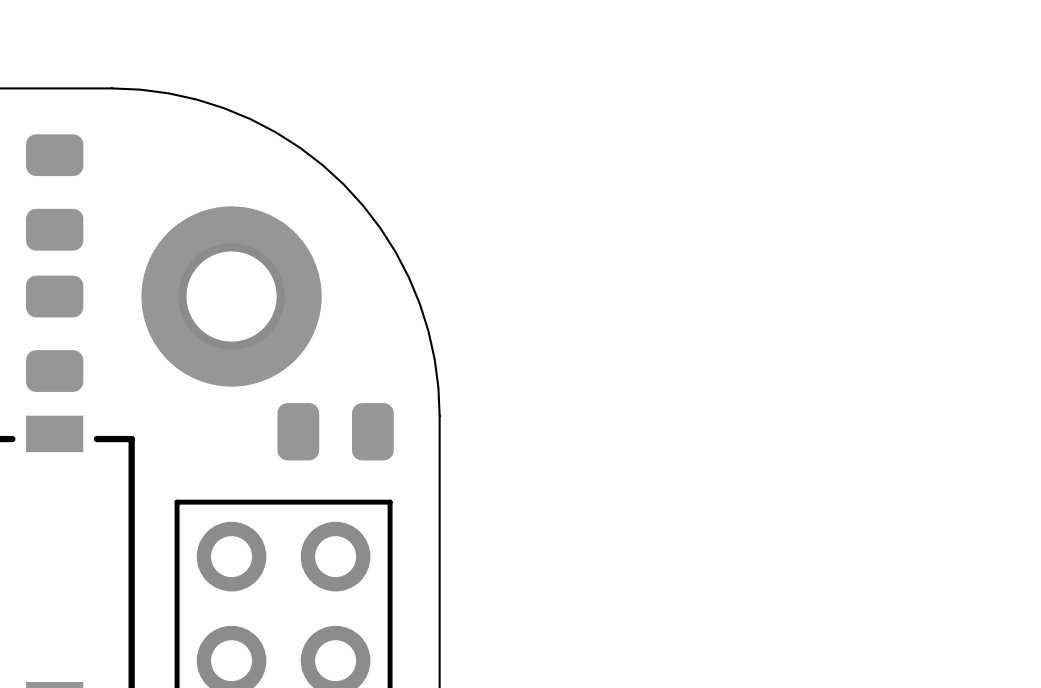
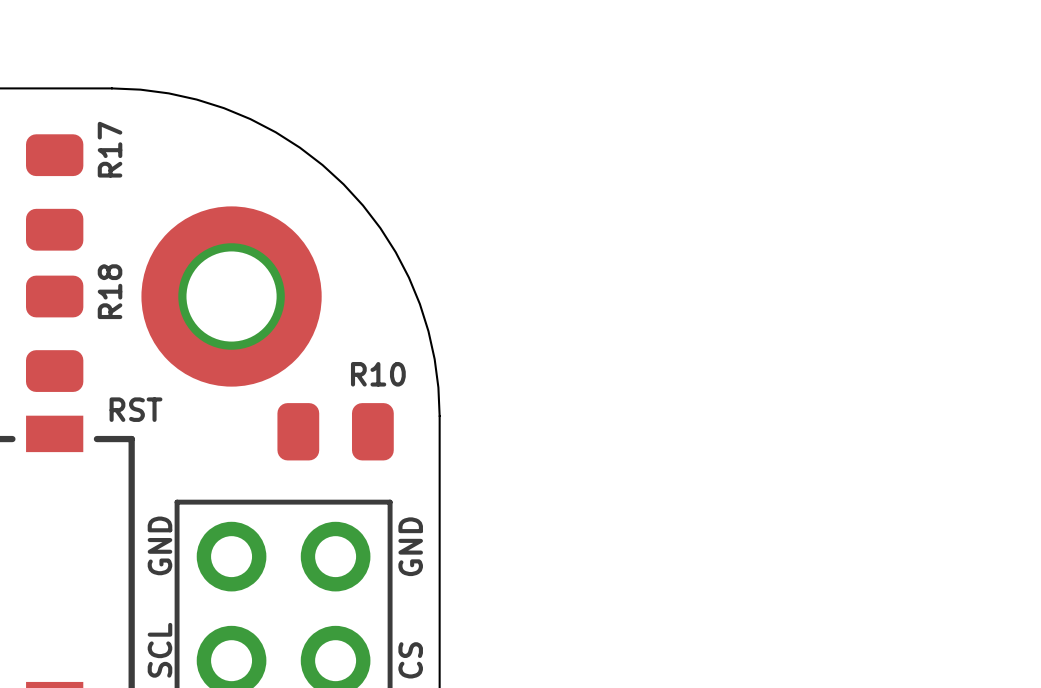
text: none -> R17 (110, 149)
text: none -> R18 (110, 291)
text: none -> R10 (378, 374)
text: none -> RST (136, 409)
text: none -> GND (159, 545)
text: none -> GND (410, 546)
text: none -> SCL (159, 650)
text: none -> CS (410, 660)

